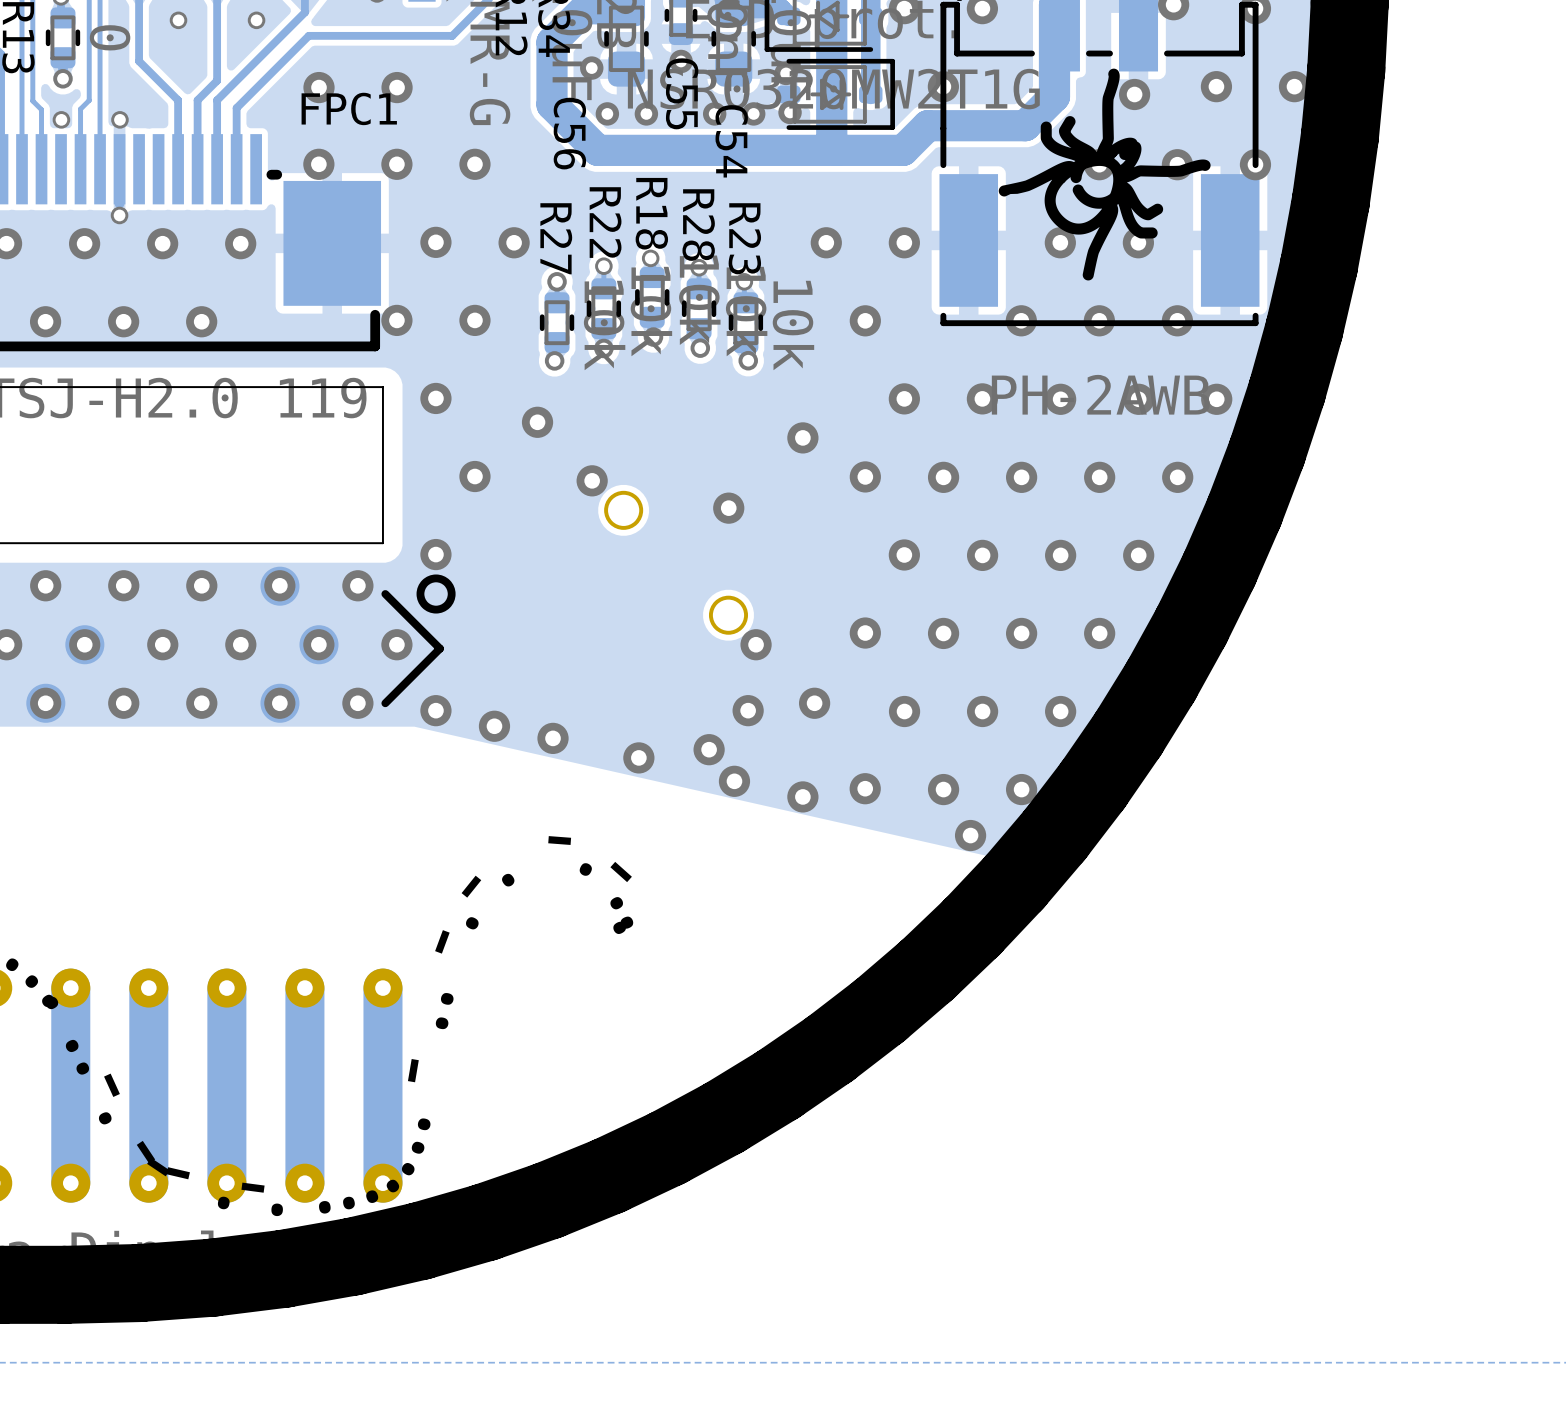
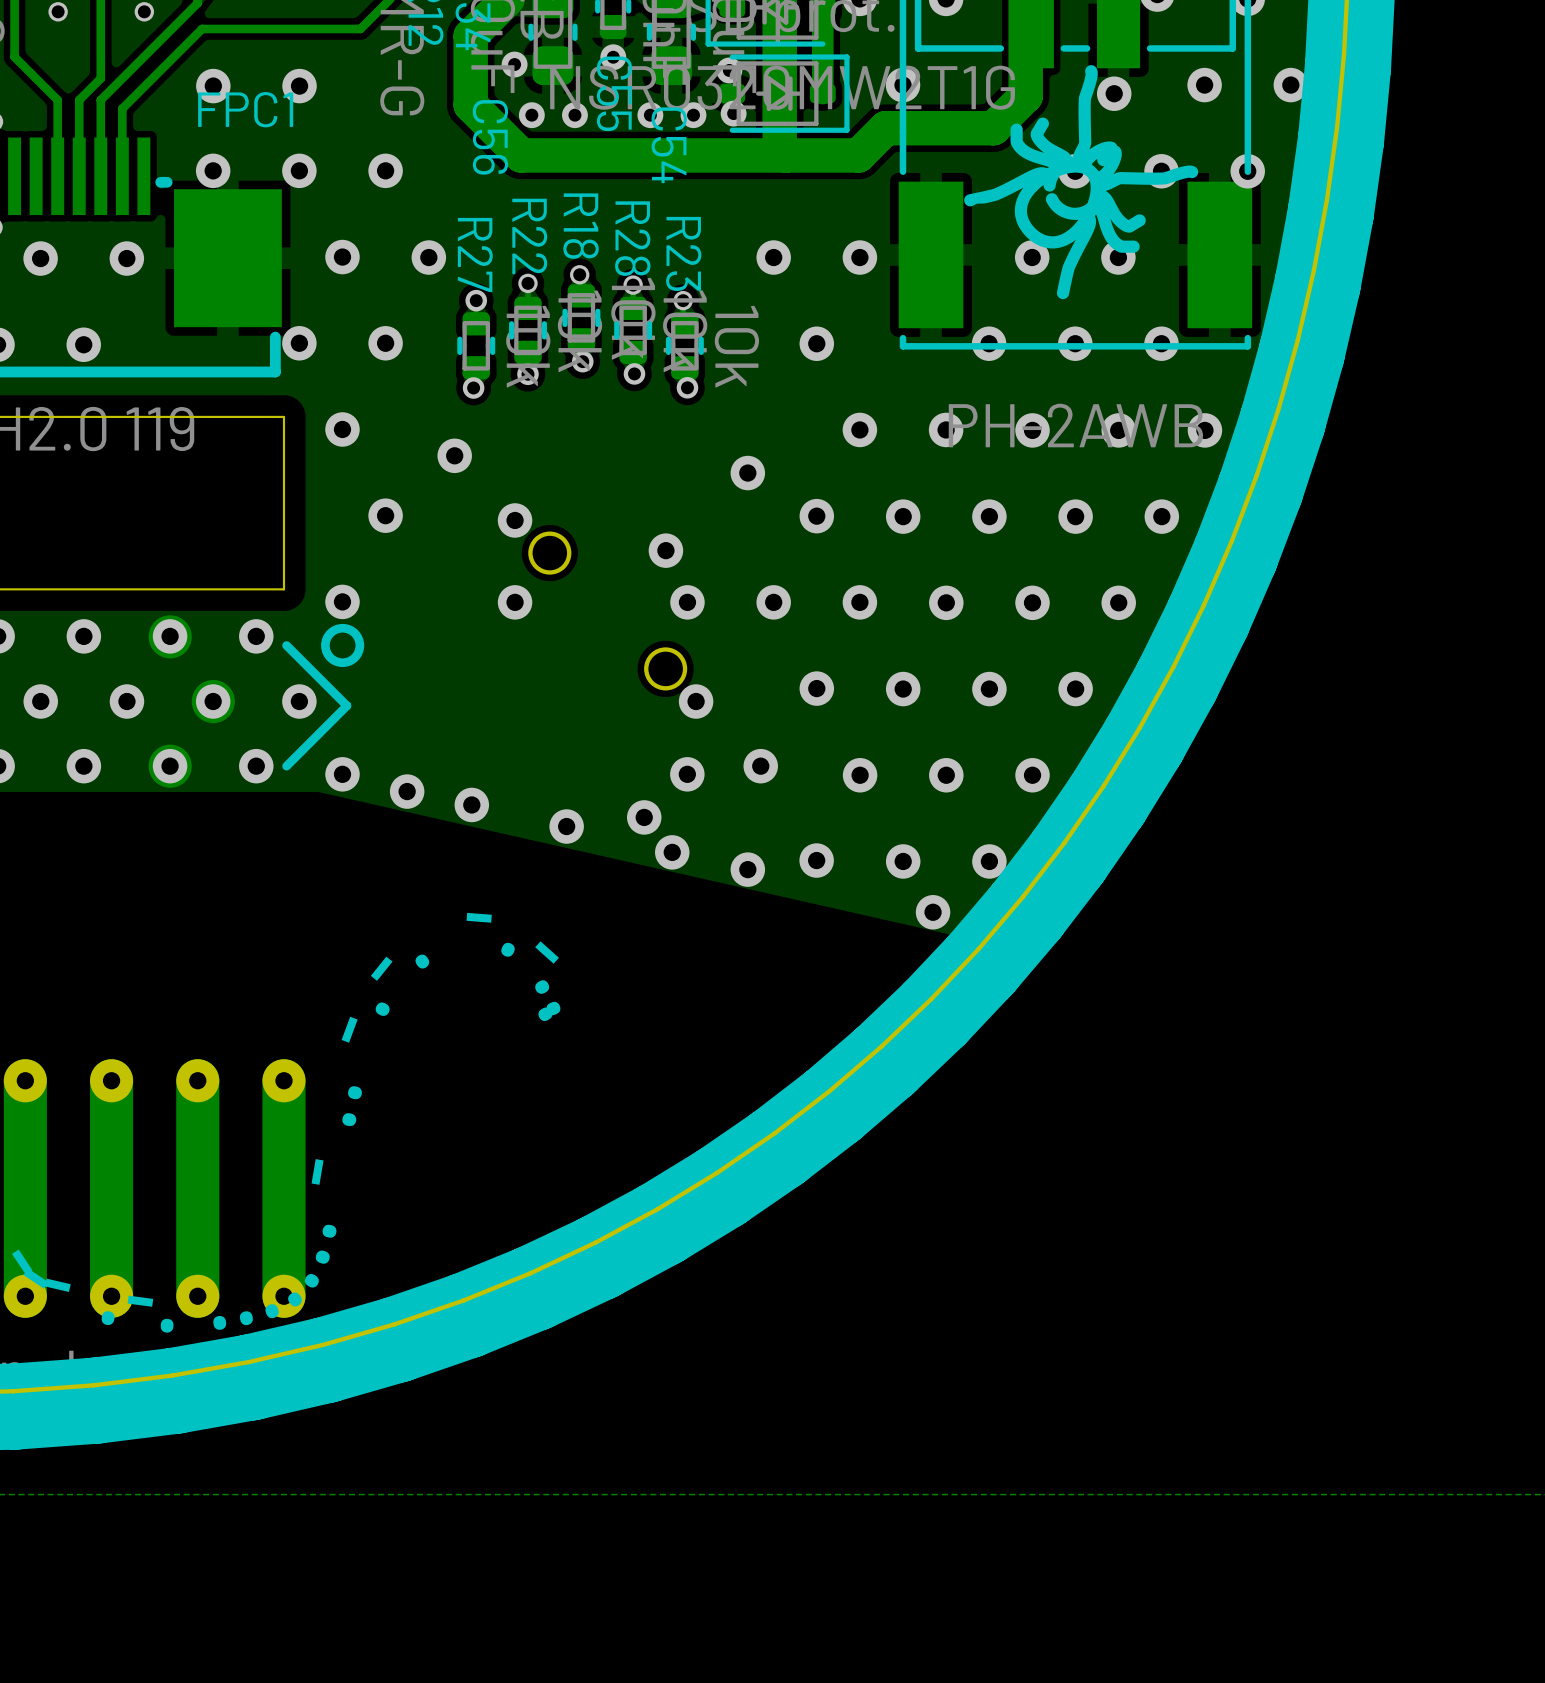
via: none -> (515, 602)
via: none -> (687, 602)
via: none -> (773, 602)

